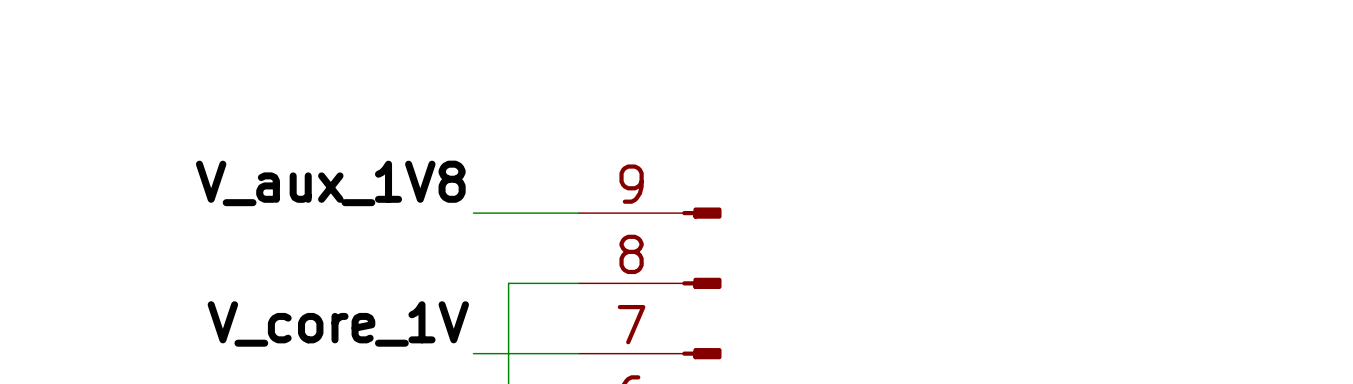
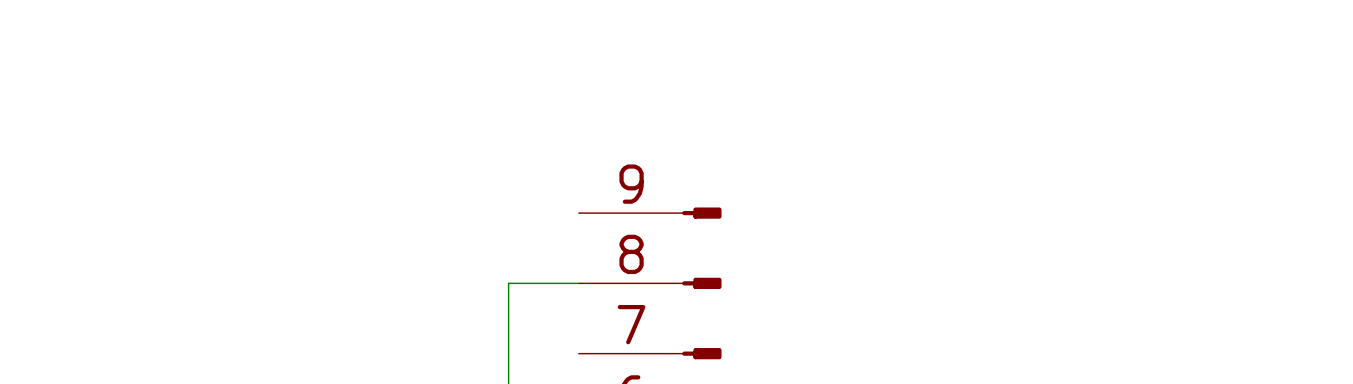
label: V_aux_1V8 (330, 183) -> none
wire: (473, 213) (578, 213) -> none
label: V_core_1V (338, 323) -> none
wire: (473, 353) (578, 353) -> none

